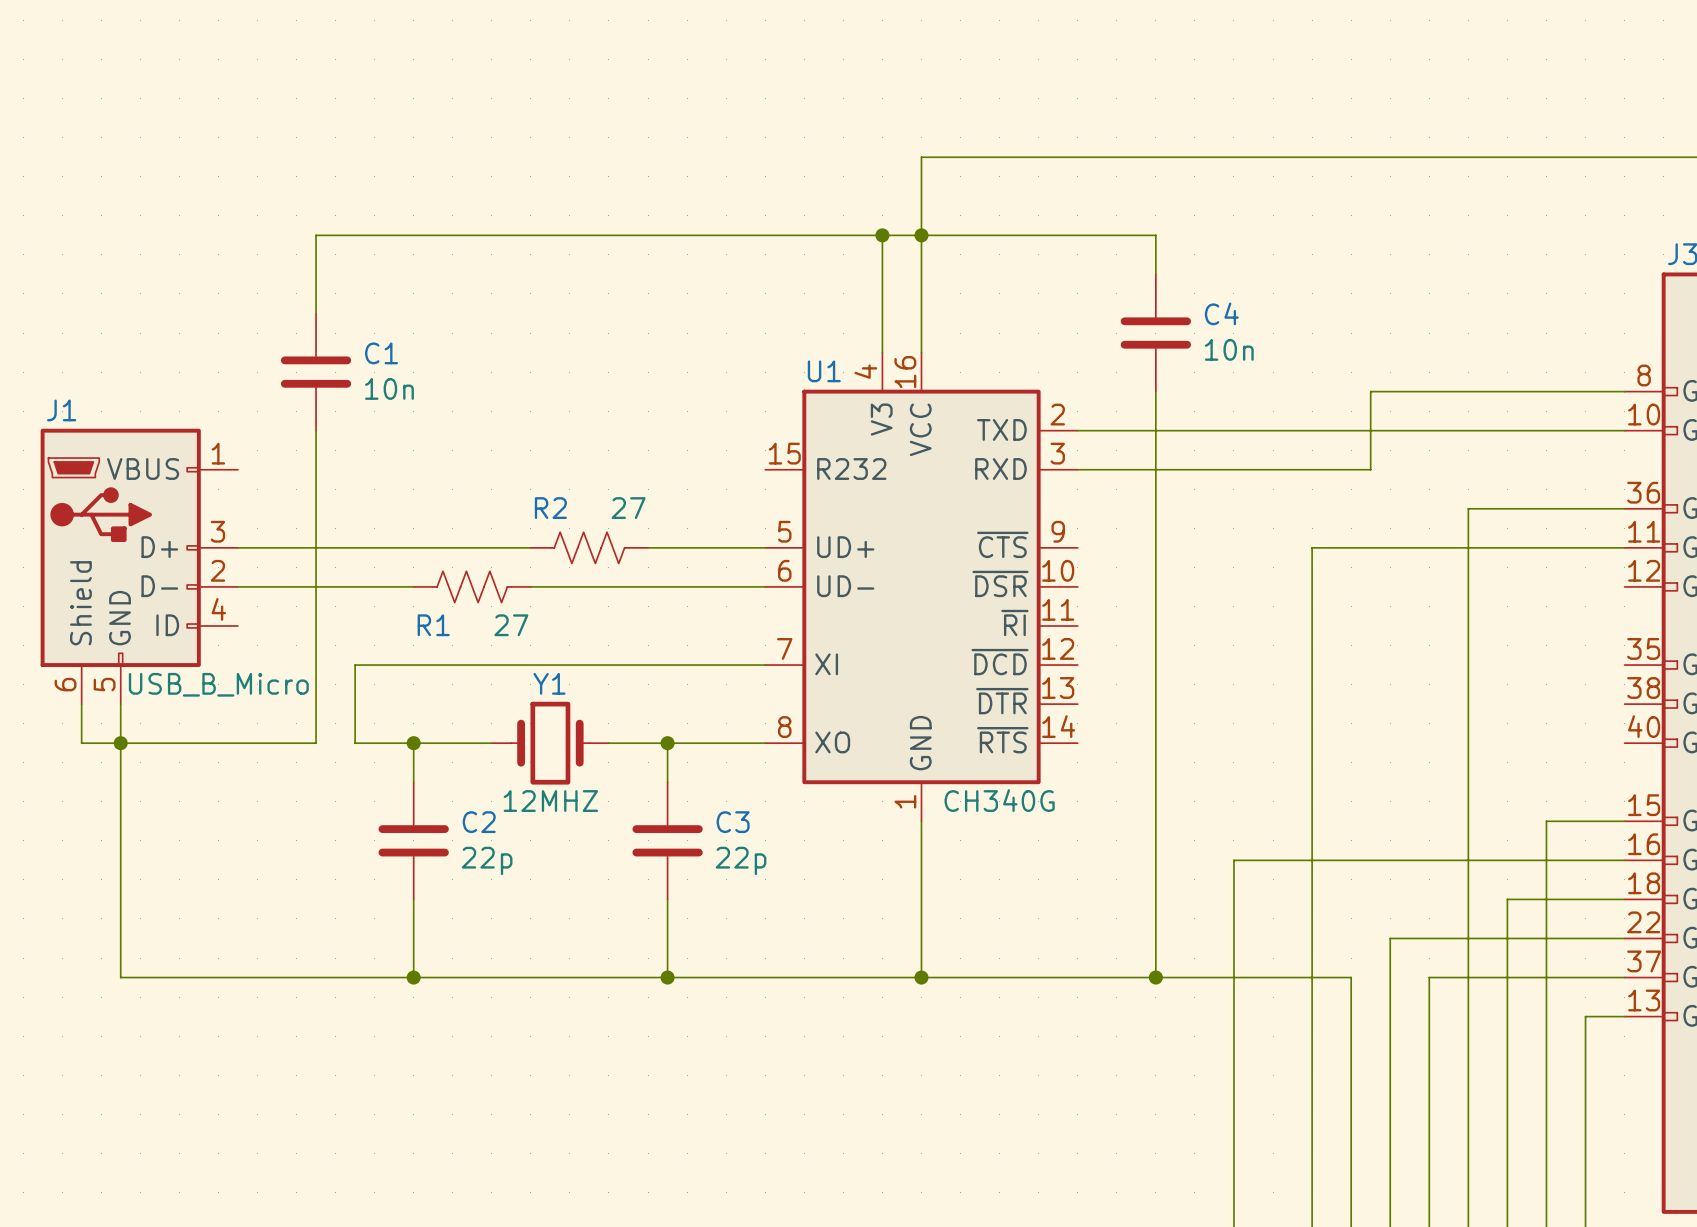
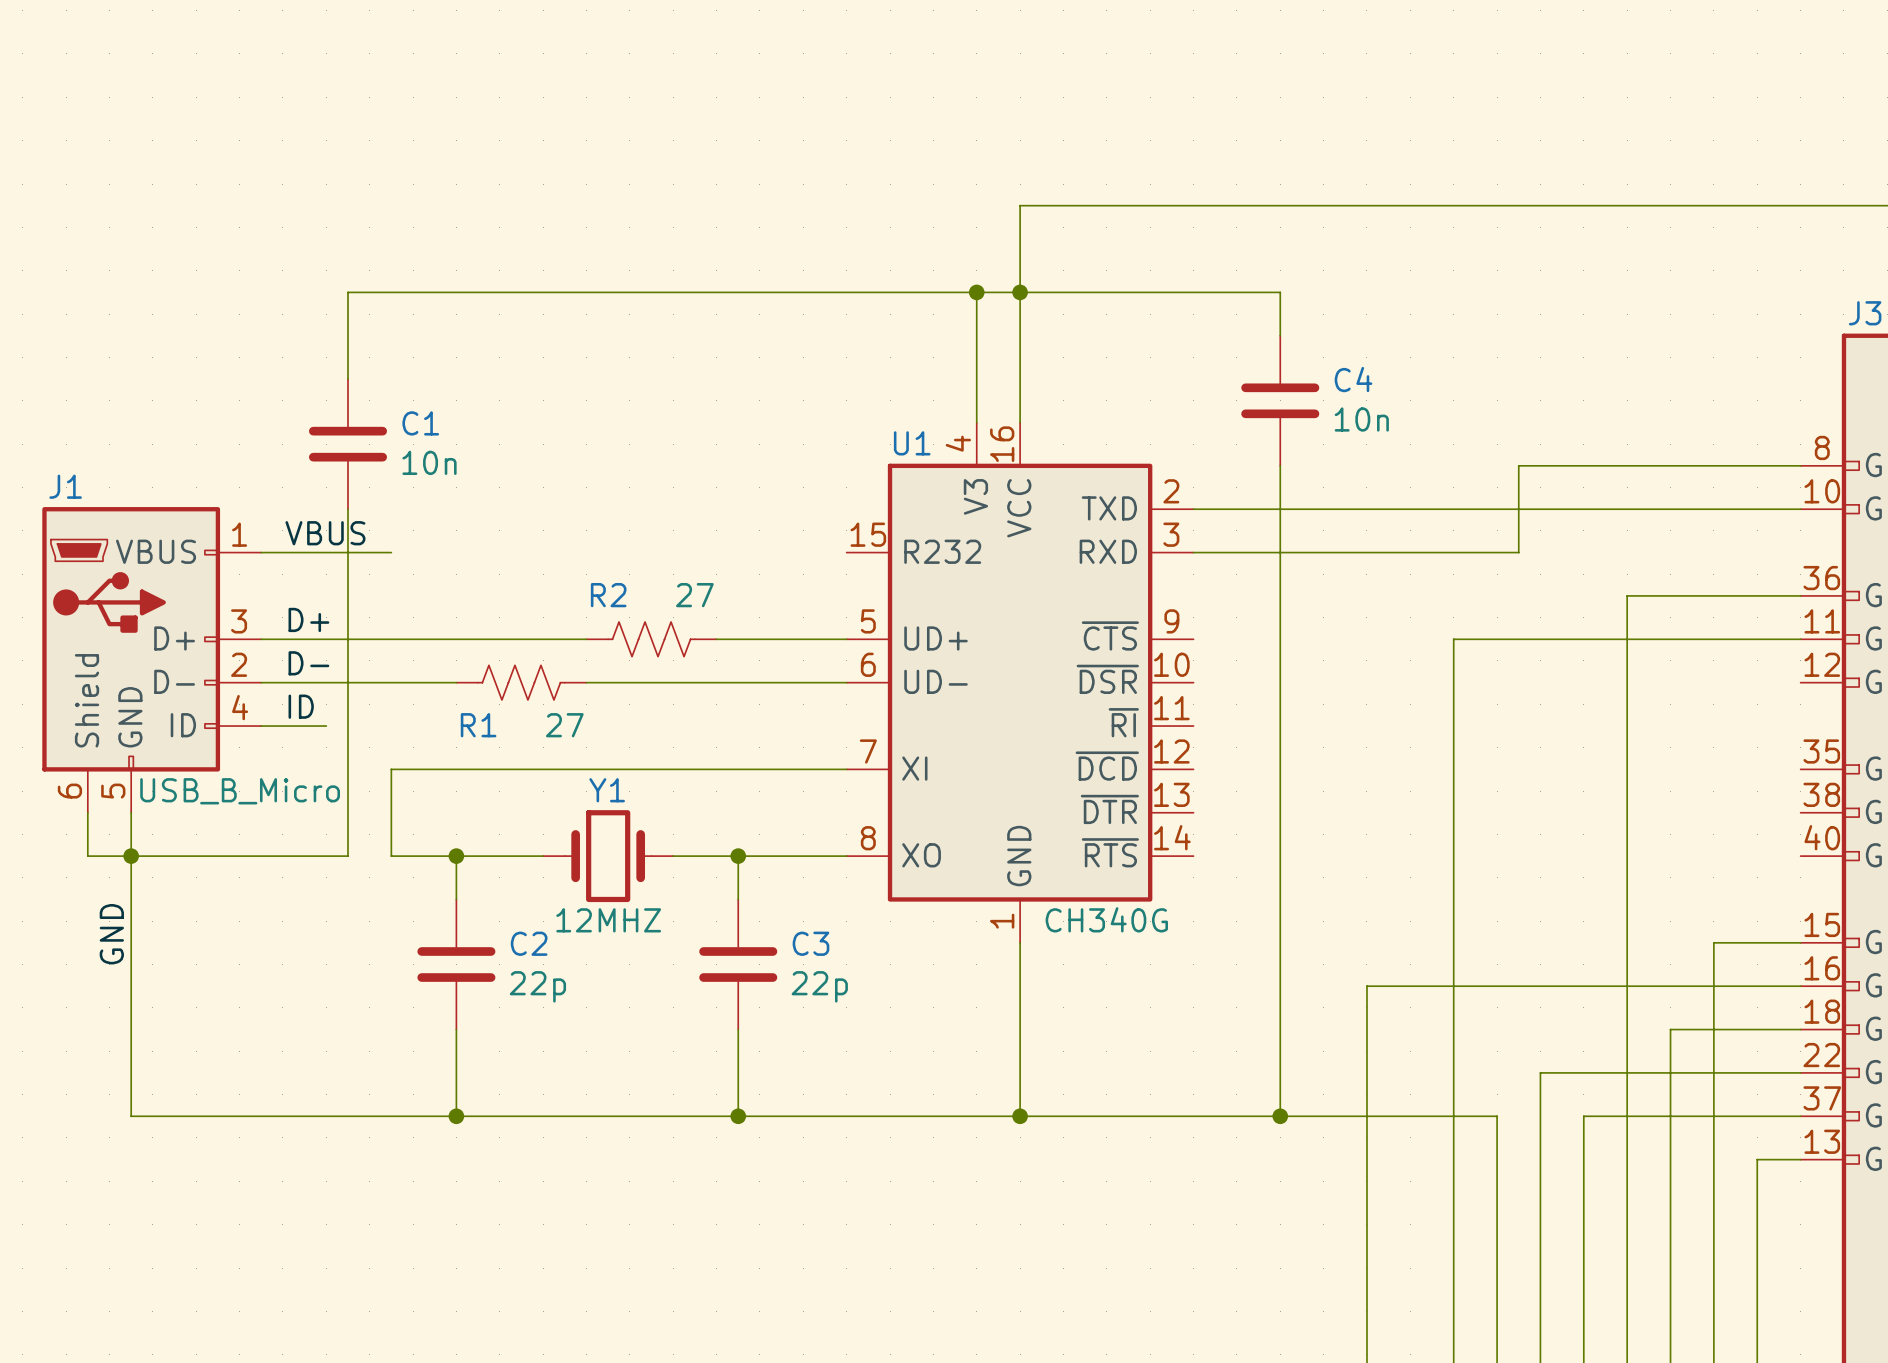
label: none -> VBUS (325, 533)
wire: none -> (261, 552) (391, 552)
label: none -> D+ (308, 619)
label: none -> D- (308, 663)
label: none -> ID (301, 706)
wire: none -> (261, 726) (326, 726)
label: none -> GND (111, 934)

